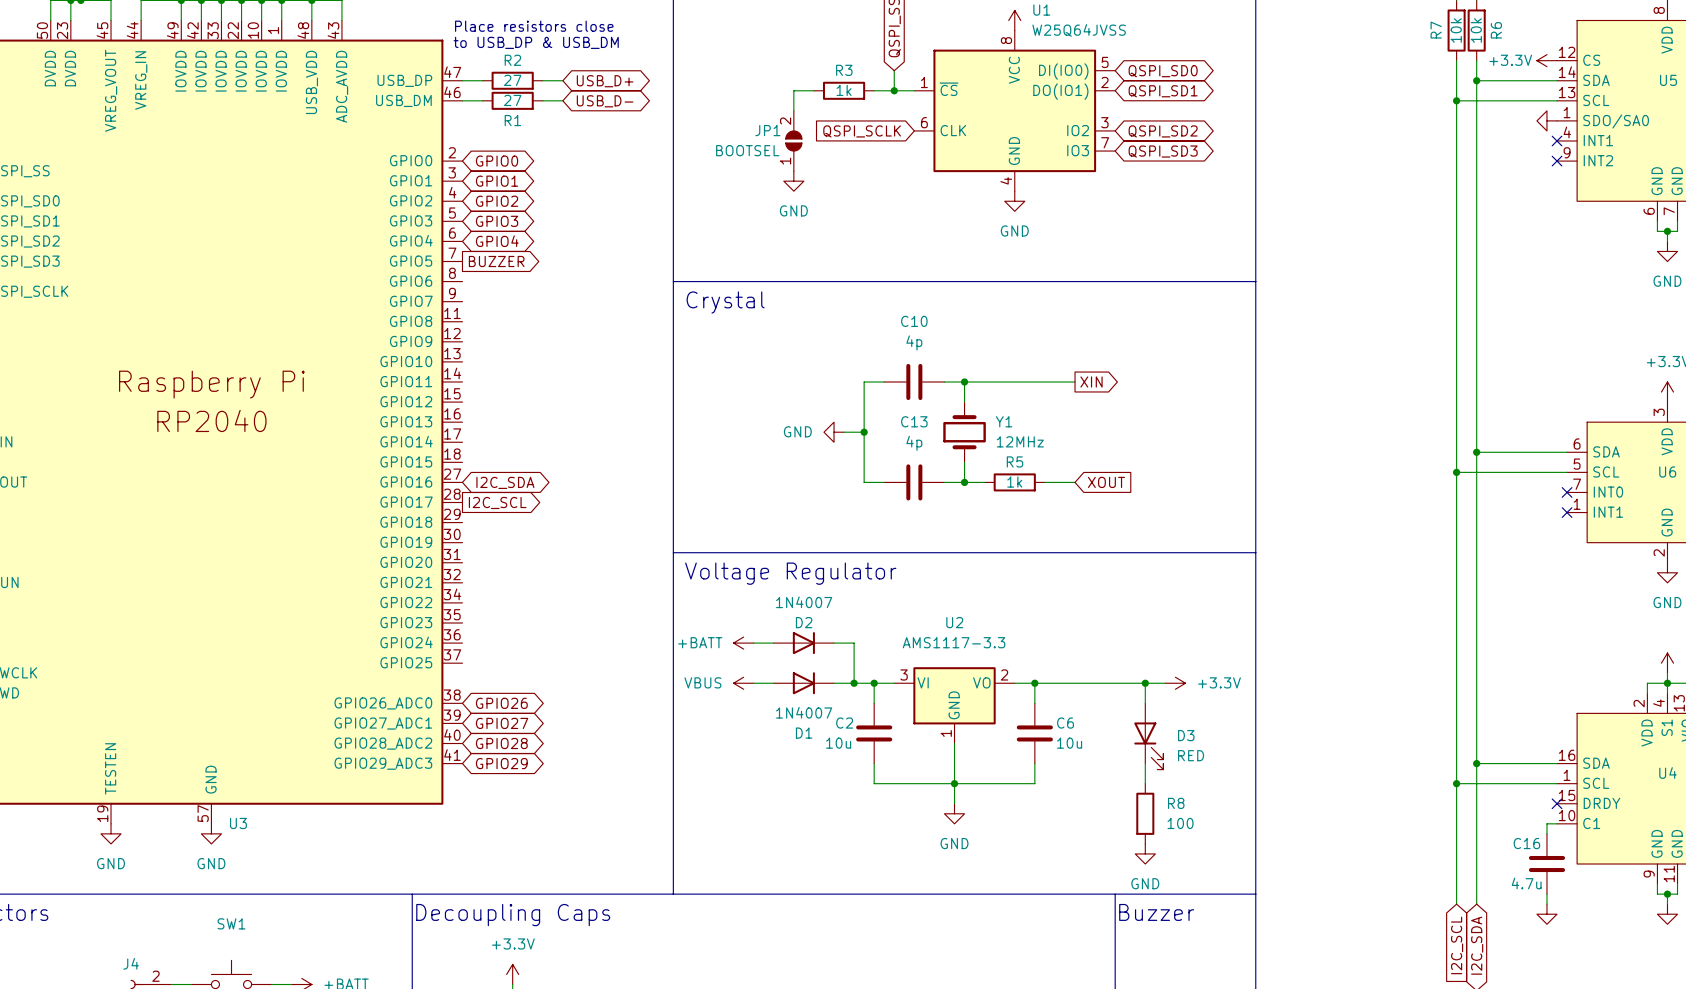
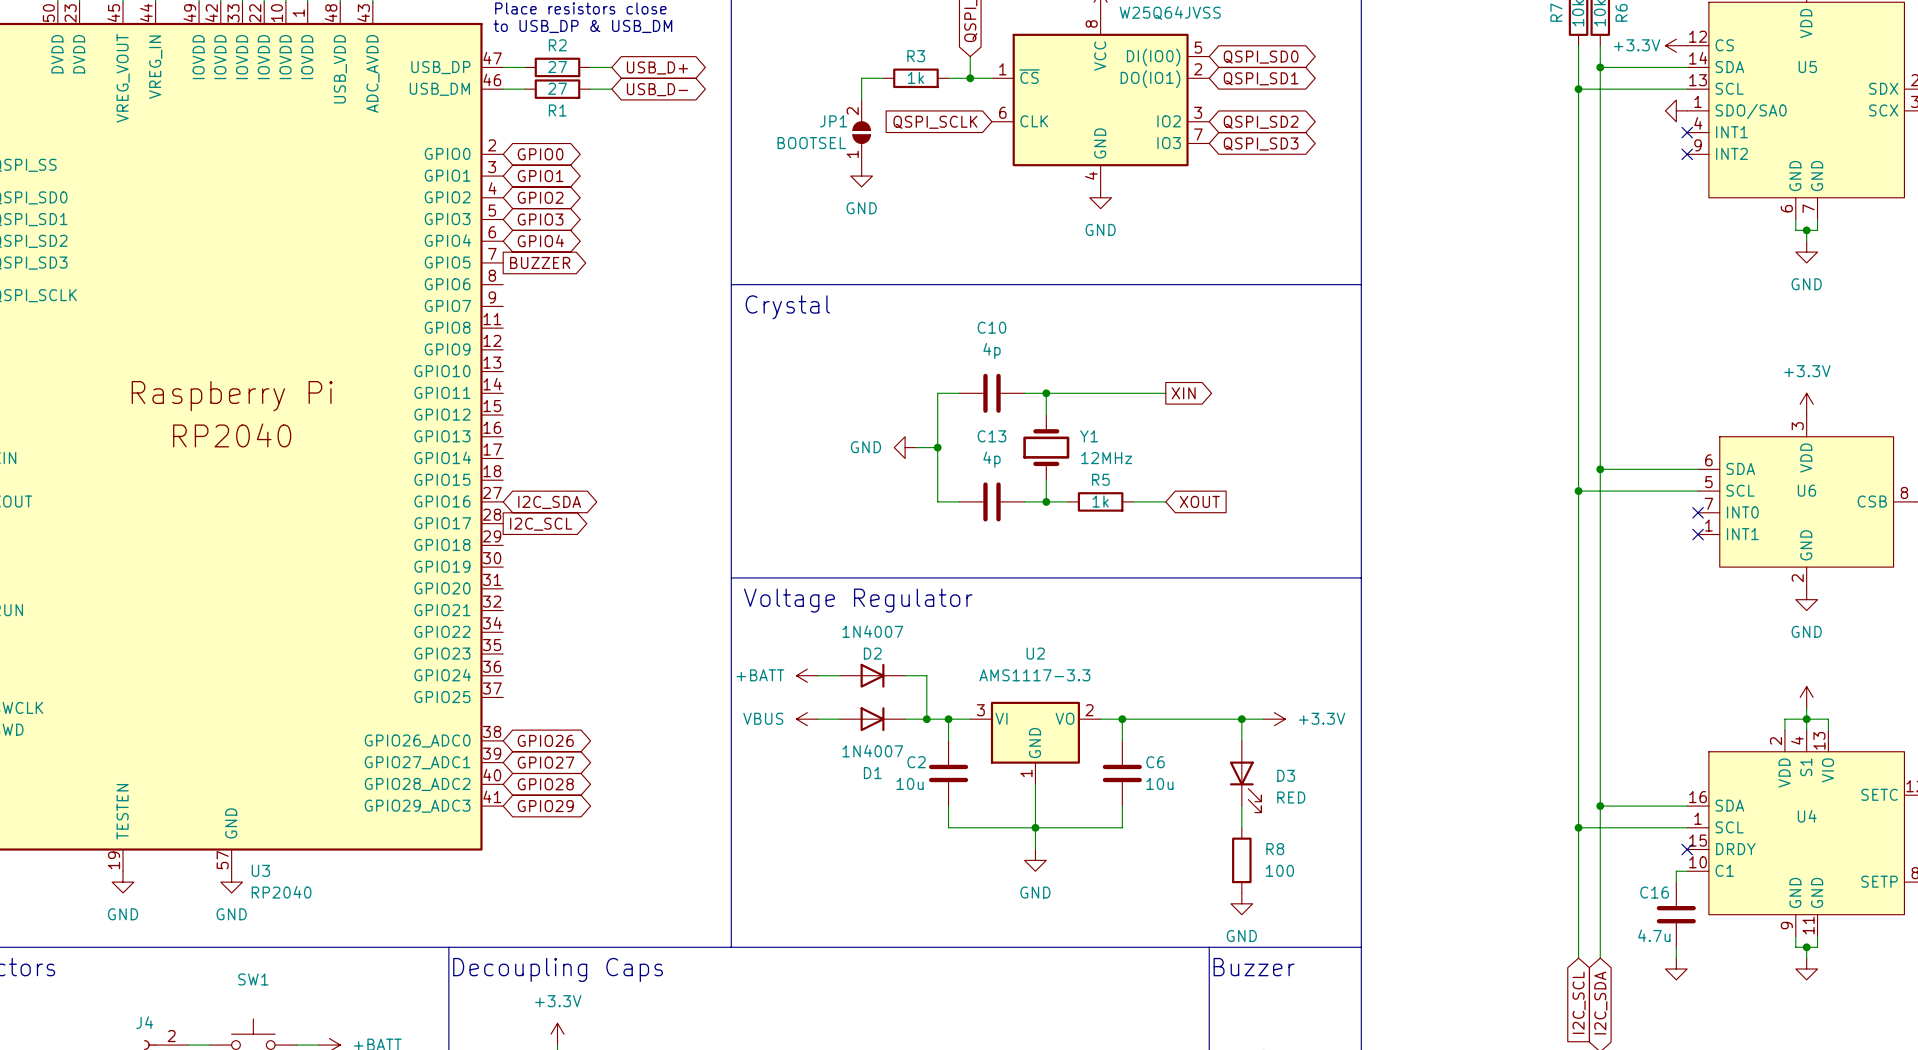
U3 value: none -> RP2040 (281, 892)

